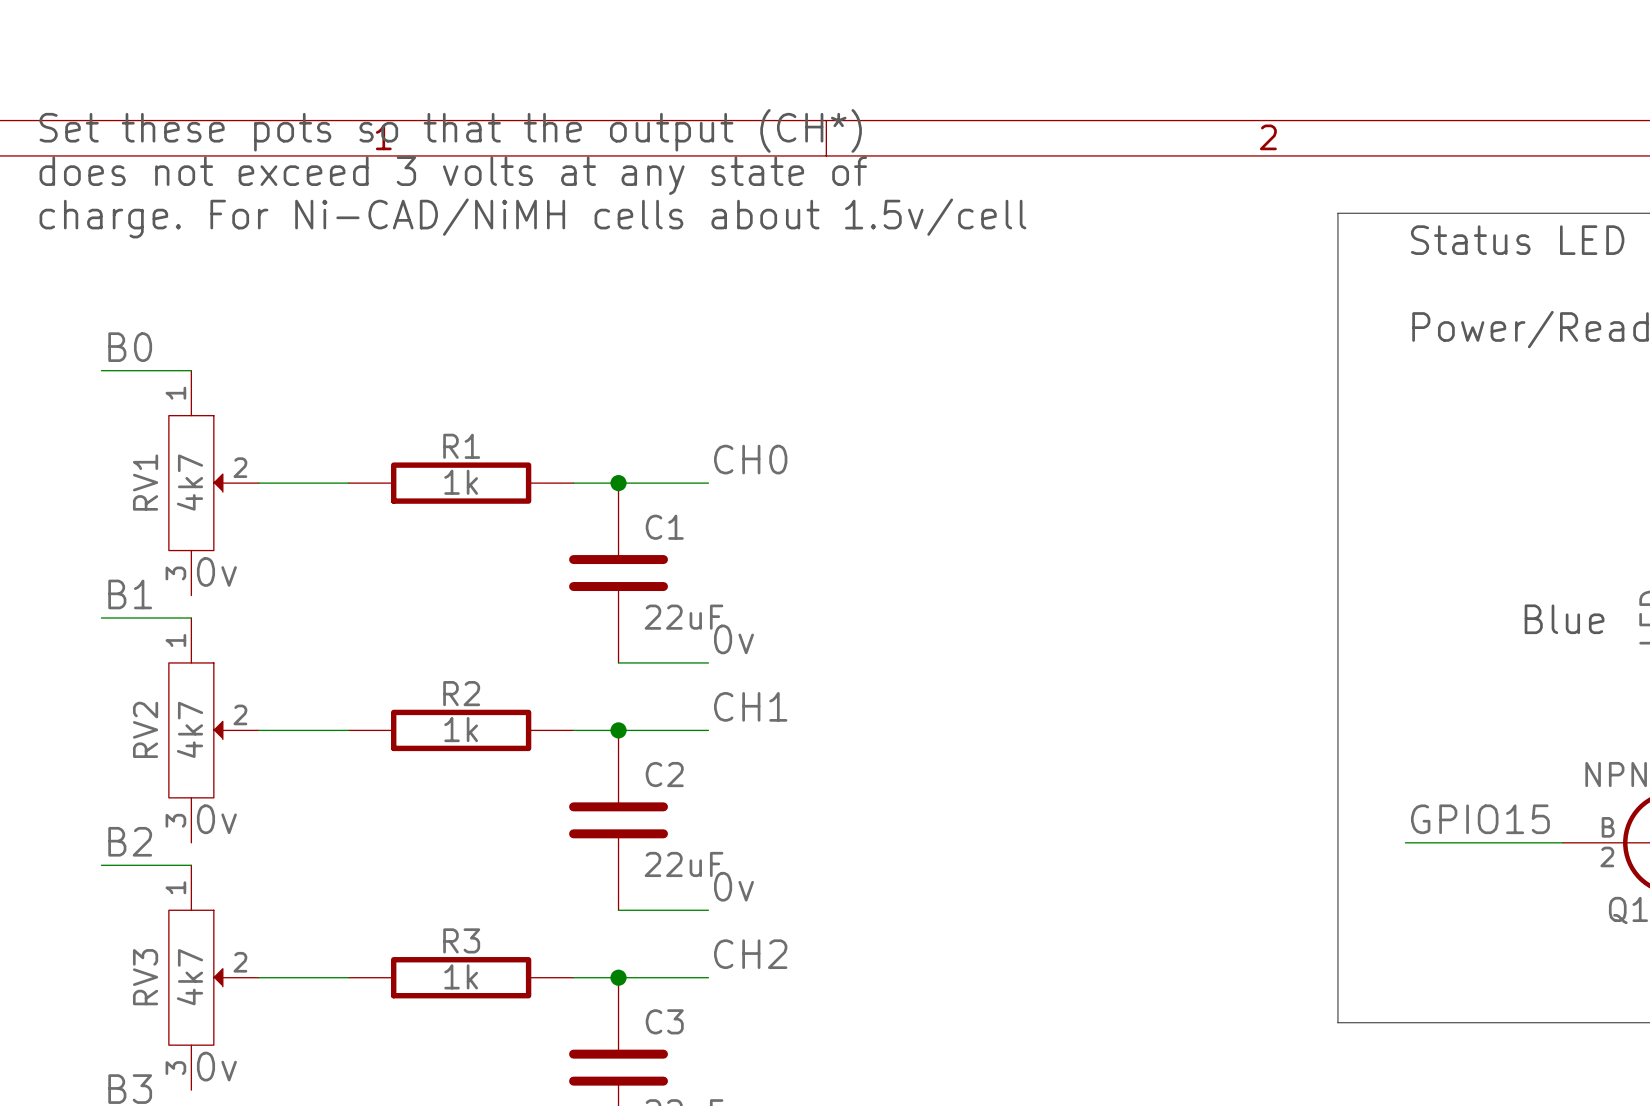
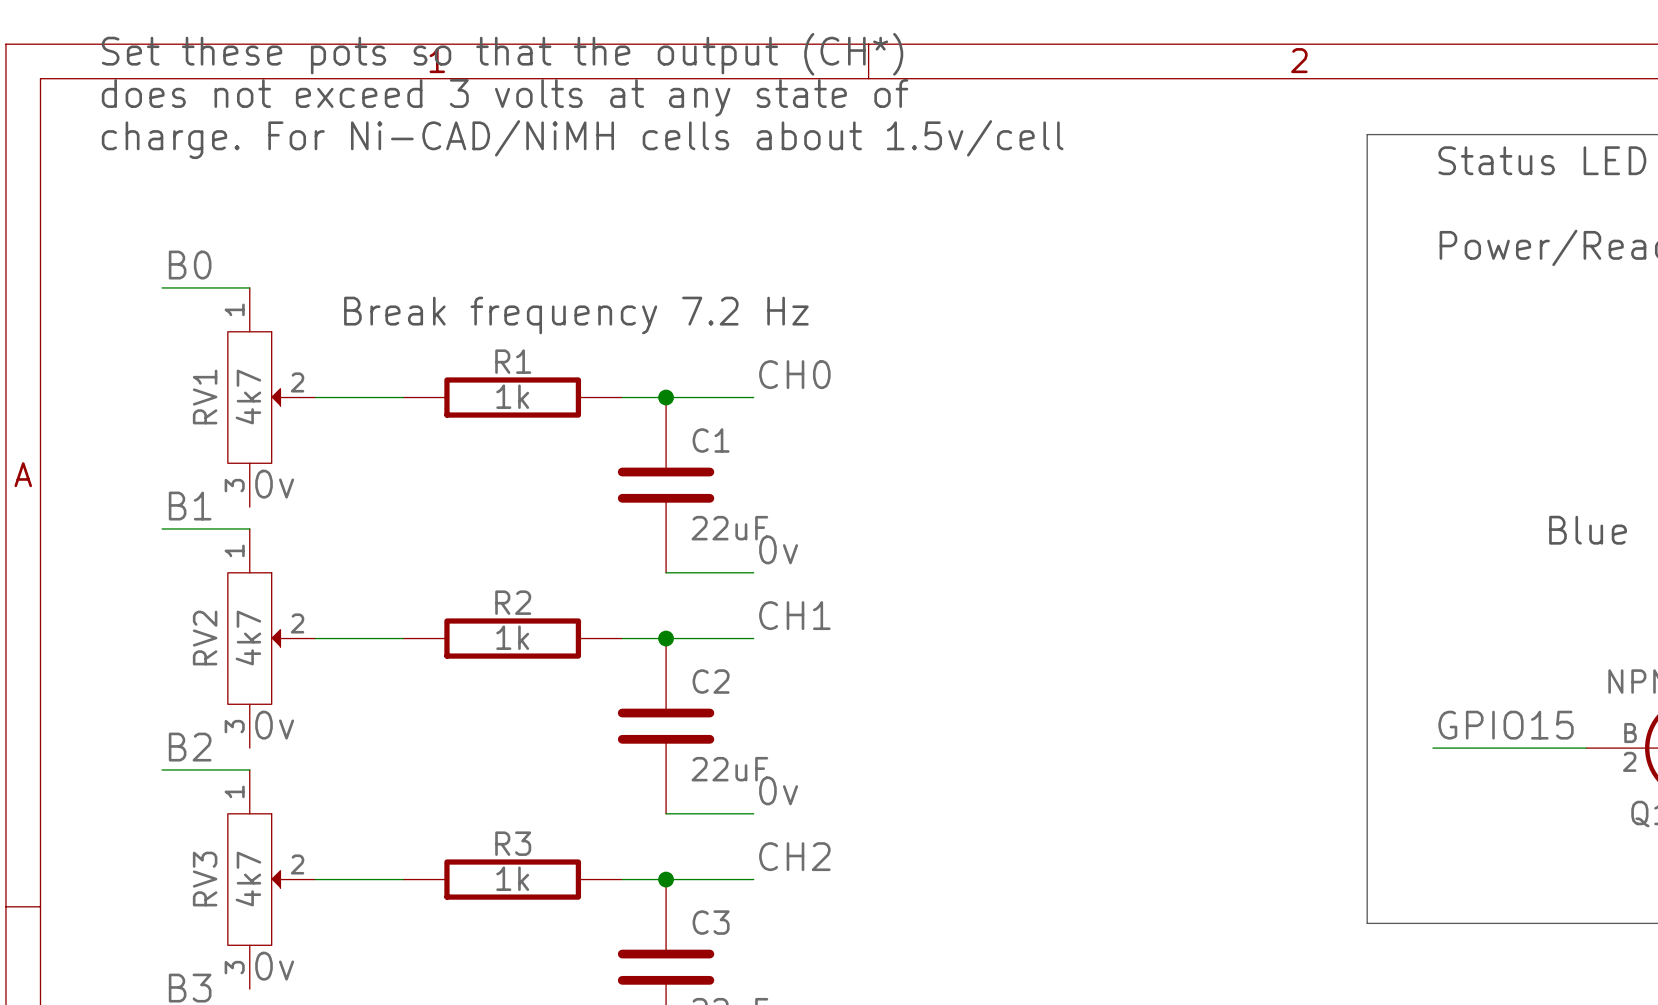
text: none -> Break frequency 7.2 Hz (576, 315)

